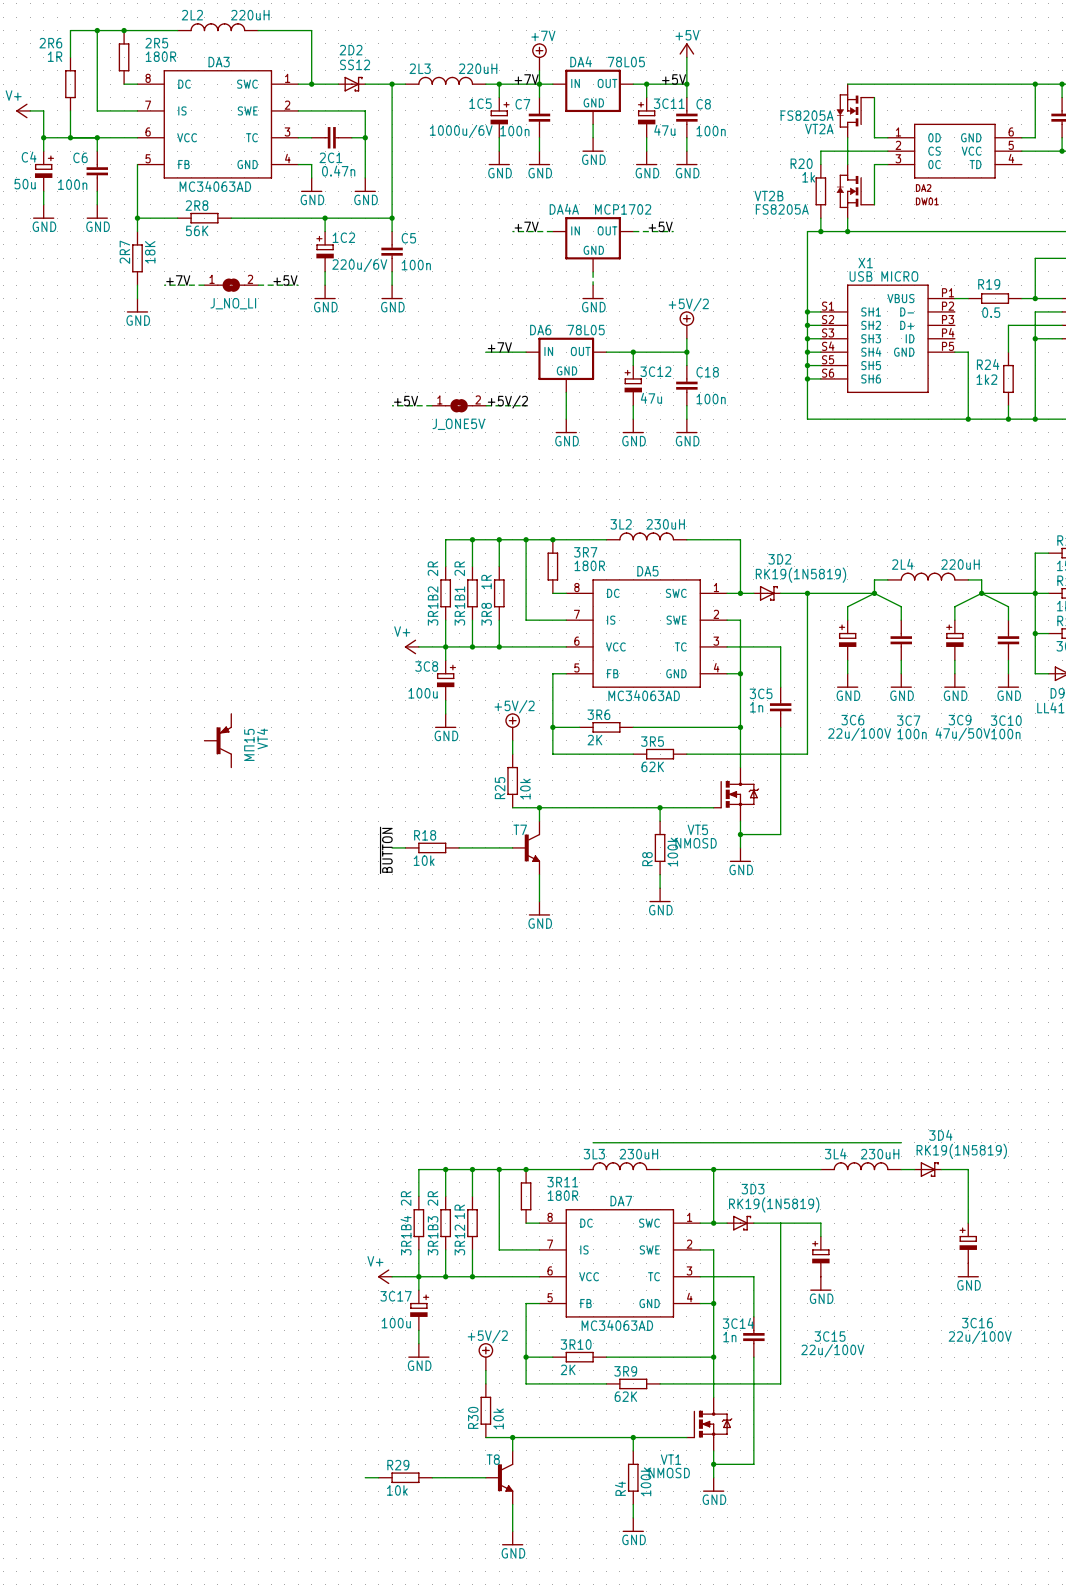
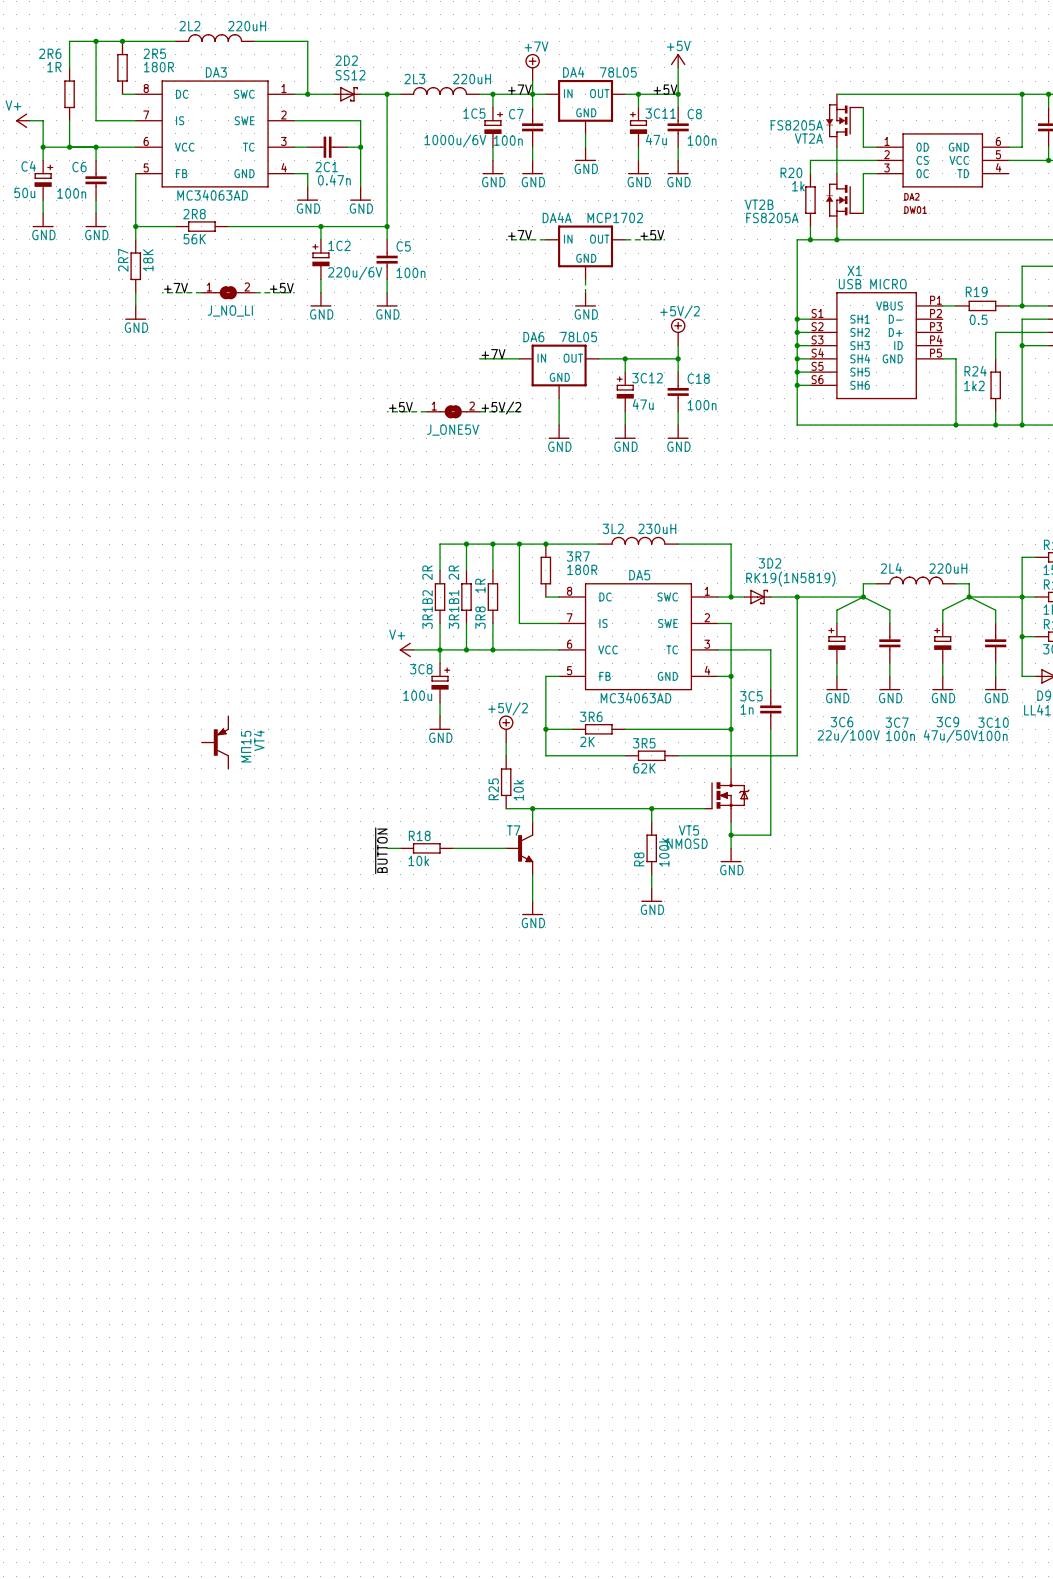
wire: (593, 1142) (901, 1142) -> none
3L3: 230uH (619, 1166) -> none
3L4: 230uH (861, 1166) -> none
wire: (445, 1169) (445, 1196) -> none
junction: (445, 1169) -> none
wire: (472, 1169) (472, 1196) -> none
junction: (472, 1169) -> none
wire: (499, 1169) (499, 1249) (539, 1249) -> none
junction: (499, 1169) -> none
junction: (526, 1169) -> none
wire: (579, 1169) (418, 1169) (418, 1196) -> none
wire: (660, 1169) (820, 1169) -> none
wire: (713, 1169) (713, 1223) -> none
junction: (713, 1169) -> none
wire: (901, 1169) (914, 1169) -> none
3D4: RK19(1N5819) (928, 1169) -> none
wire: (941, 1169) (968, 1169) (968, 1223) -> none
3R11: 180R (526, 1196) -> none
3R1B4: 2R (418, 1223) -> none
3R1B3: 2R (445, 1223) -> none
3R12: 1R (472, 1223) -> none
wire: (526, 1223) (539, 1223) -> none
wire: (700, 1223) (727, 1223) -> none
junction: (713, 1223) -> none
3D3: RK19(1N5819) (740, 1223) -> none
wire: (753, 1223) (820, 1223) (820, 1236) -> none
wire: (780, 1223) (780, 1383) (660, 1383) -> none
3C16: 22u/100V (968, 1243) -> none
wire: (418, 1249) (418, 1290) -> none
wire: (445, 1249) (445, 1276) -> none
wire: (472, 1249) (472, 1276) -> none
wire: (700, 1249) (713, 1249) (713, 1397) -> none
3C15: 22u/100V (820, 1256) -> none
DA7: MC34063AD (619, 1263) -> none
power symbol: GND (968, 1270) -> none
power symbol: V+ (385, 1276) -> none
wire: (392, 1276) (539, 1276) -> none
junction: (418, 1276) -> none
junction: (445, 1276) -> none
junction: (472, 1276) -> none
wire: (700, 1276) (753, 1276) (753, 1316) -> none
power symbol: GND (820, 1283) -> none
wire: (539, 1303) (526, 1303) (526, 1383) (606, 1383) -> none
wire: (700, 1303) (713, 1303) -> none
junction: (713, 1303) -> none
3C17: 100u (418, 1310) -> none
wire: (418, 1330) (418, 1343) -> none
3C14: 1n (753, 1337) -> none
power symbol: GND (418, 1350) -> none
power symbol: +5V/2 (485, 1356) -> none
wire: (526, 1357) (552, 1357) -> none
junction: (526, 1357) -> none
3R10: 2K (579, 1357) -> none
wire: (606, 1357) (713, 1357) -> none
junction: (713, 1357) -> none
wire: (753, 1357) (753, 1464) (713, 1464) -> none
wire: (485, 1370) (485, 1383) -> none
3R9: 62K (633, 1383) -> none
R30: 10k (485, 1410) -> none
VT1: NMOSD (709, 1424) -> none
wire: (485, 1437) (686, 1437) -> none
wire: (512, 1437) (512, 1450) -> none
junction: (512, 1437) -> none
wire: (633, 1437) (633, 1450) -> none
junction: (633, 1437) -> none
wire: (713, 1450) (713, 1477) -> none
junction: (713, 1464) -> none
wire: (365, 1477) (378, 1477) -> none
R29: 10k (405, 1477) -> none
wire: (432, 1477) (485, 1477) -> none
T8: (499, 1477) -> none
R4: 100k (633, 1477) -> none
power symbol: GND (713, 1484) -> none
wire: (512, 1504) (512, 1531) -> none
wire: (633, 1504) (633, 1517) -> none
power symbol: GND (633, 1524) -> none
power symbol: GND (512, 1538) -> none

